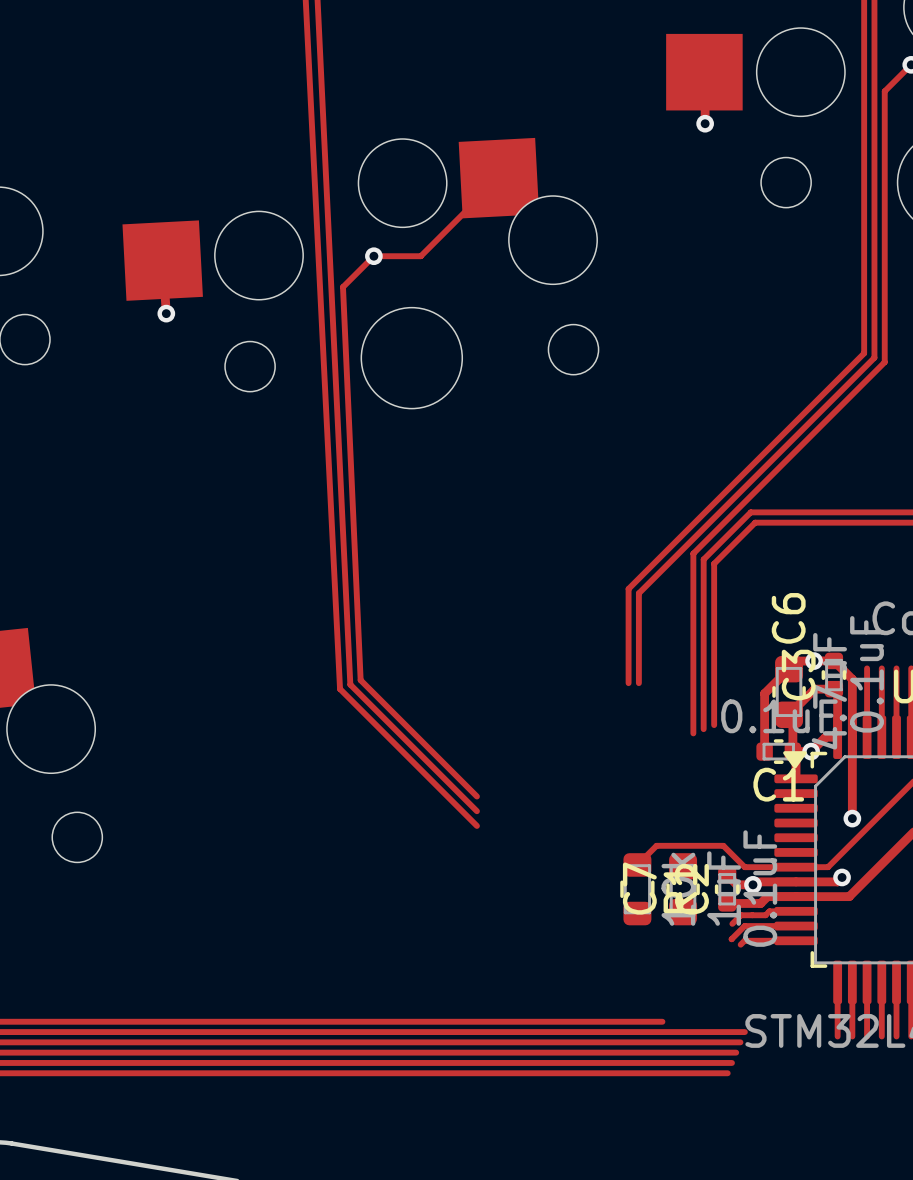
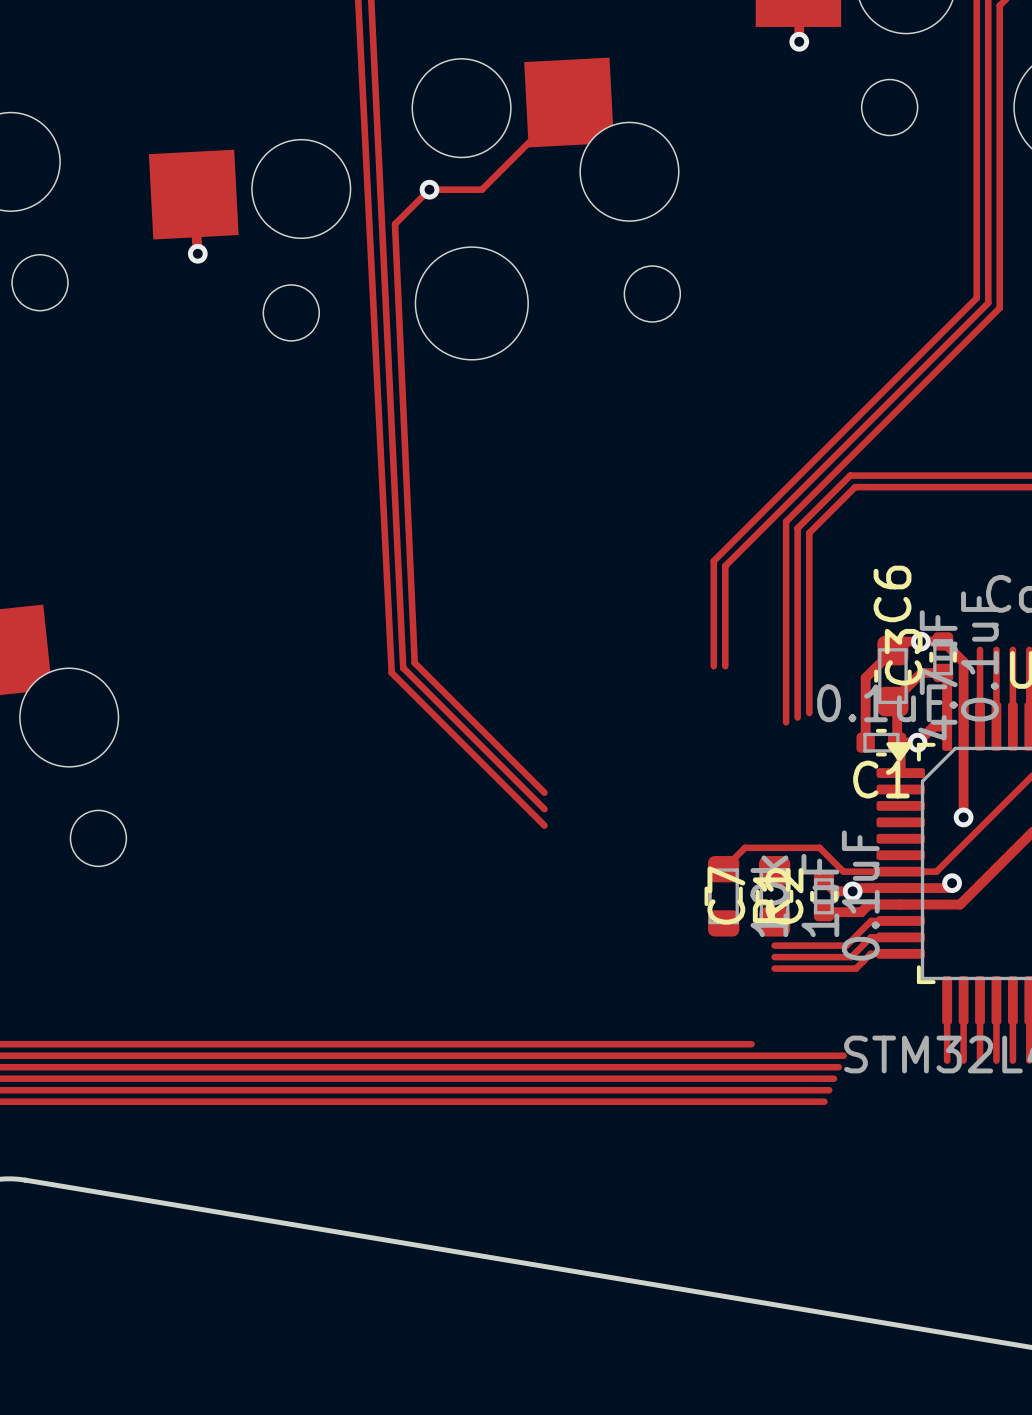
track: (765, 915) (740, 915) (732, 923) -> (866, 925) (846, 945) (774, 945)
track: (769, 926) (744, 926) (731, 939) -> (870, 937) (851, 957) (774, 957)
track: (769, 940) (744, 940) (740, 944) -> (870, 953) (855, 968) (774, 968)

